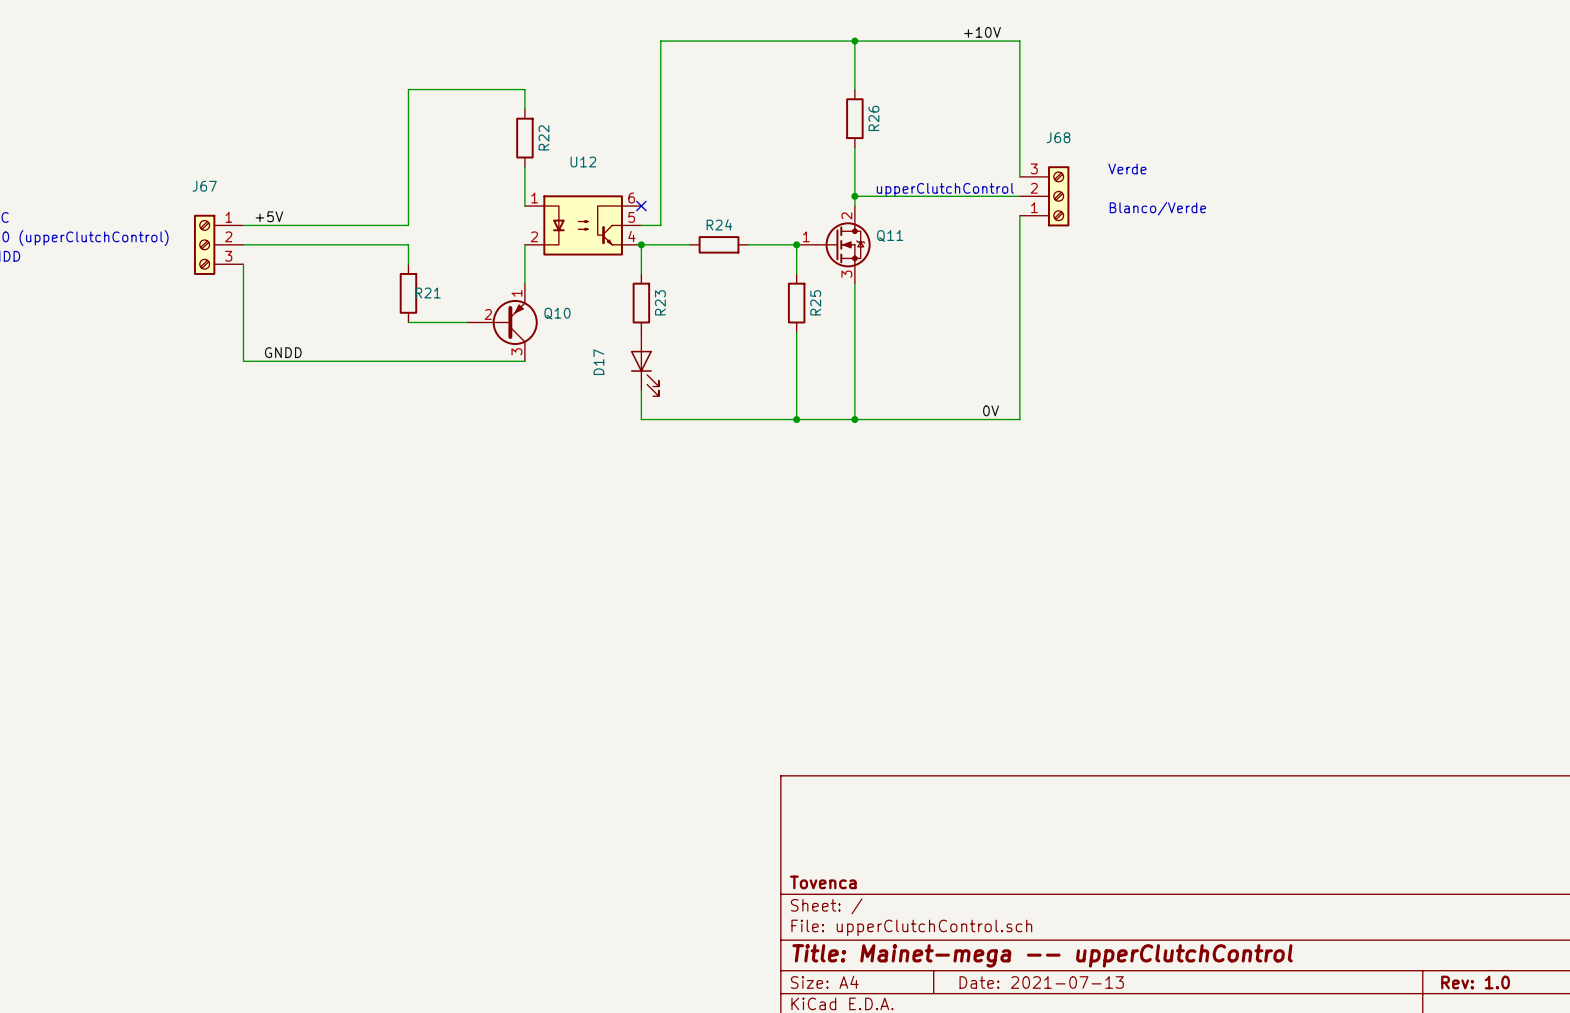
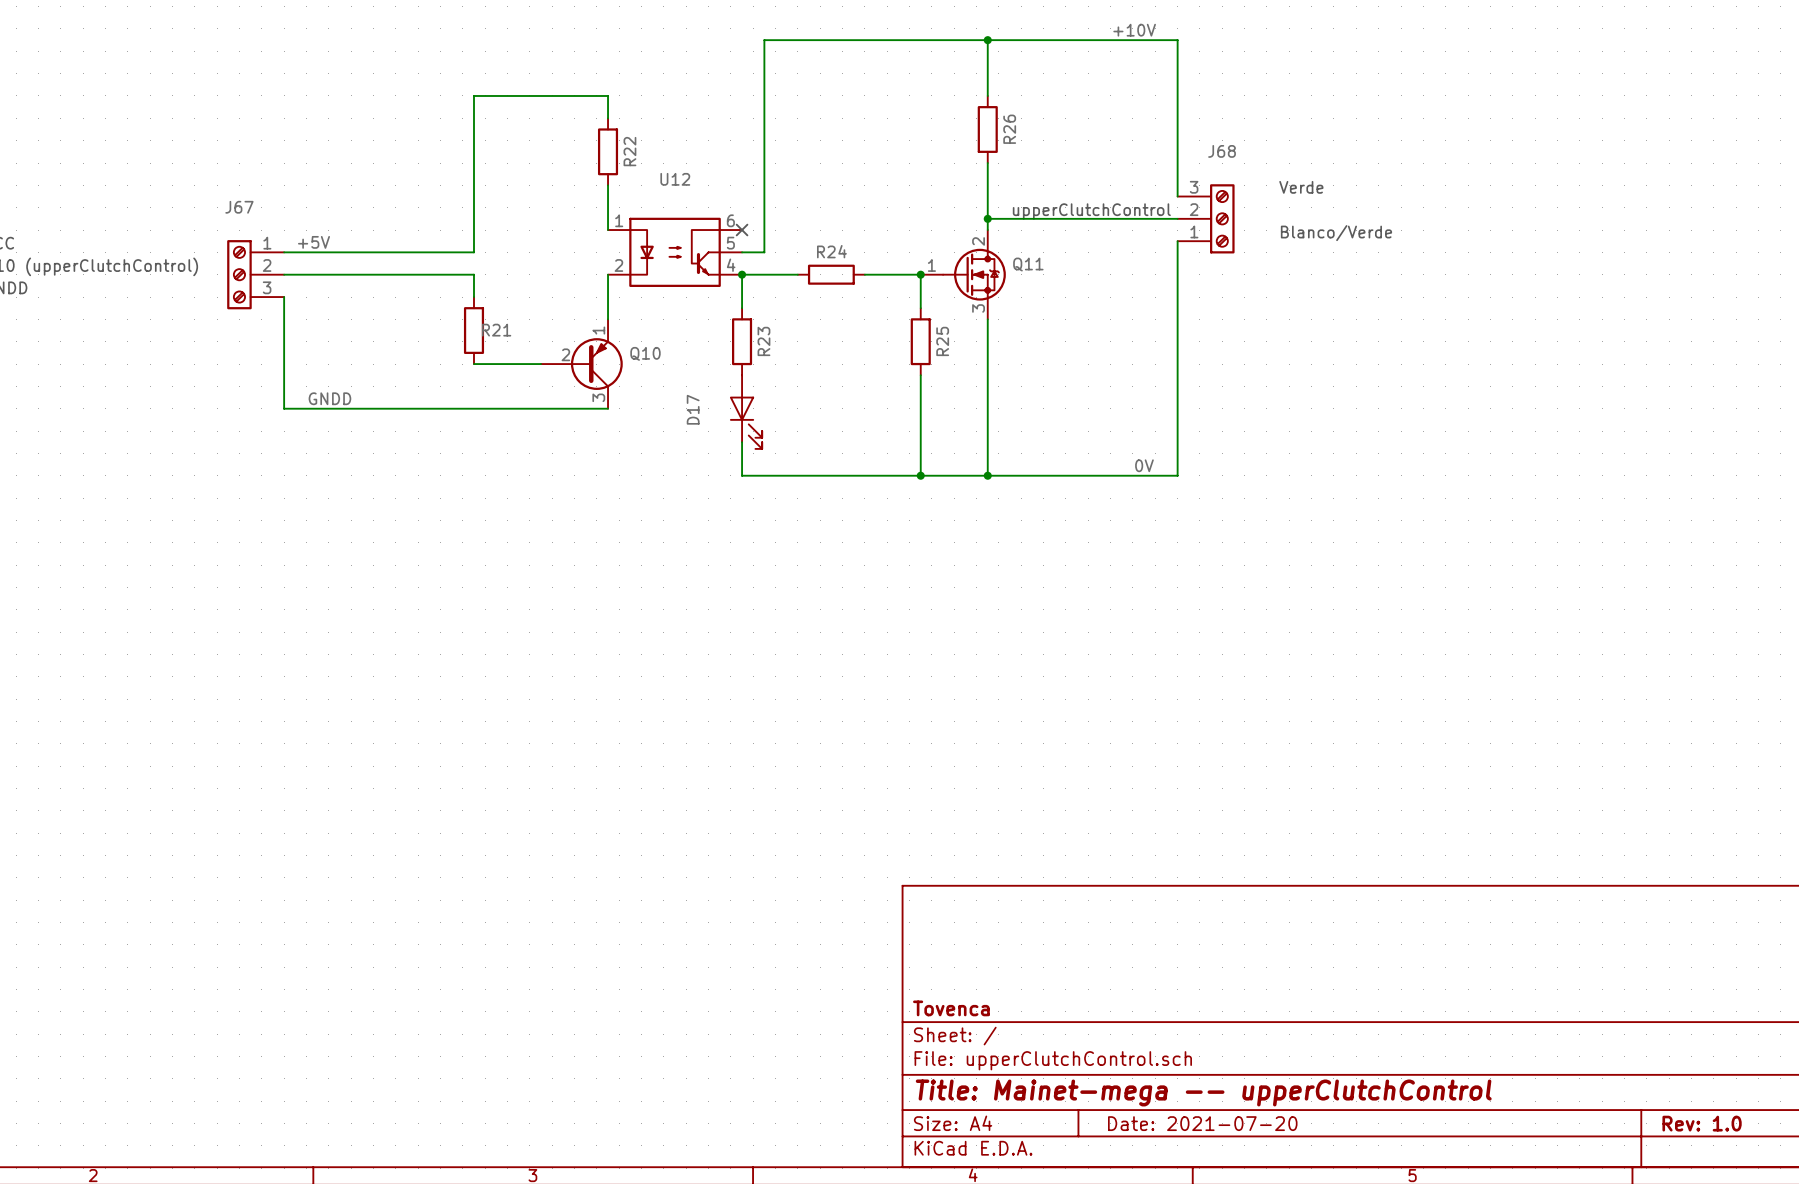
title block: Date: 2021-07-13 (1041, 982) -> Date: 2021-07-20 (1202, 1123)

